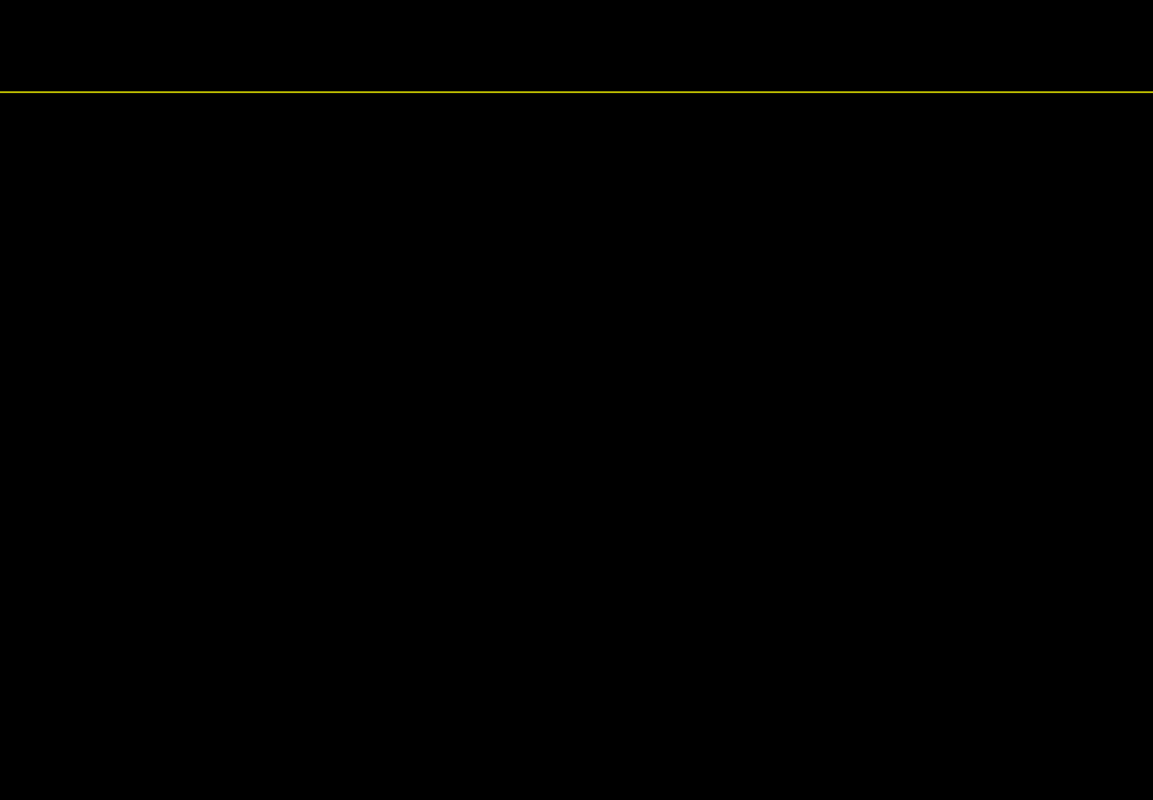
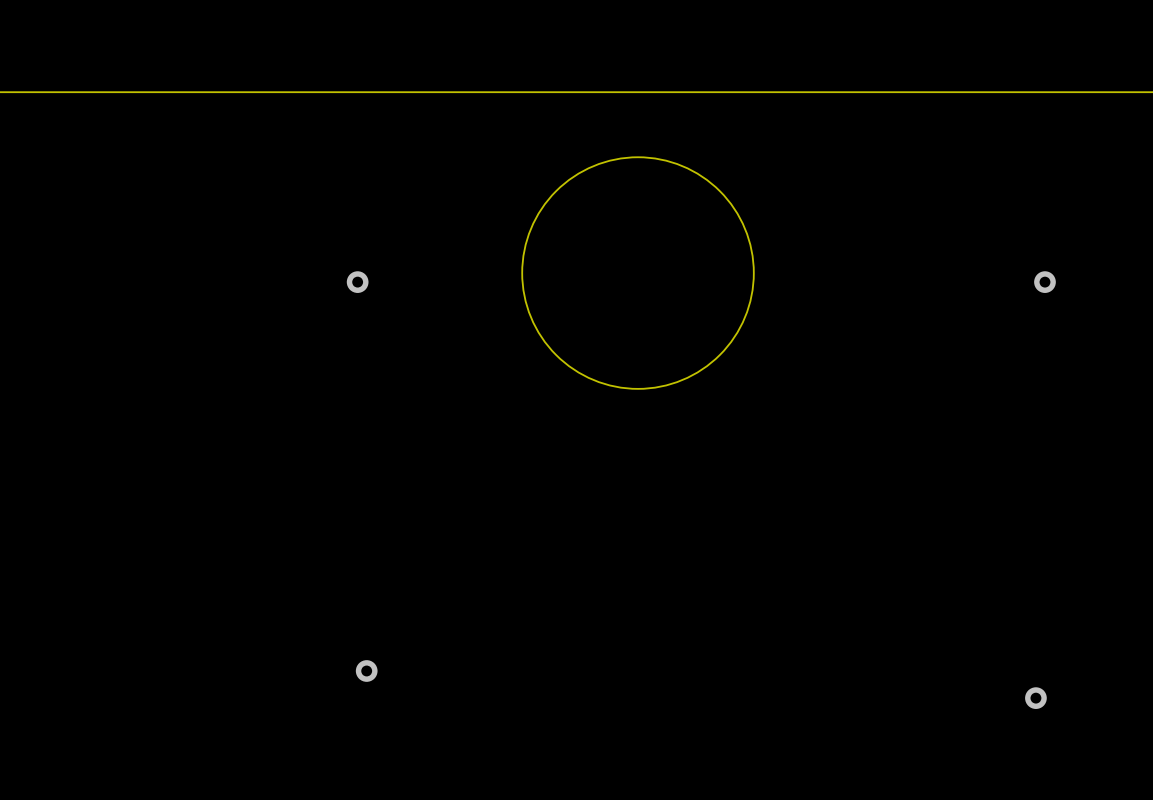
round board edge: none -> [521, 156, 755, 390]
via: none -> (357, 282)
via: none -> (1044, 282)
via: none -> (366, 671)
via: none -> (1035, 698)

